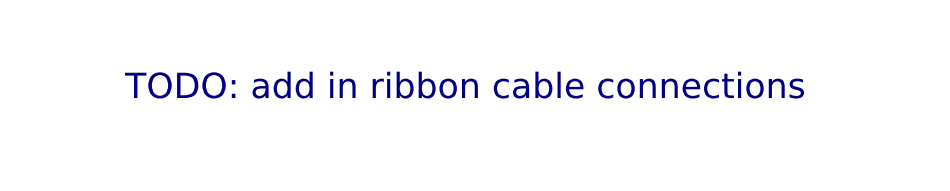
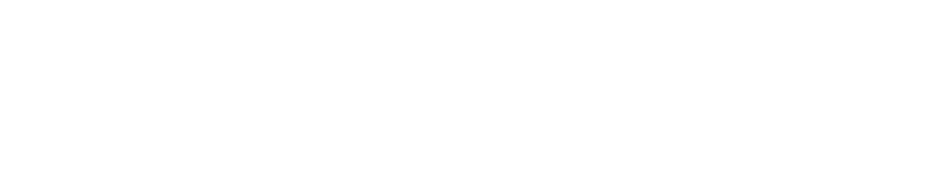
text: TODO: add in ribbon cable connections (464, 85) -> none

